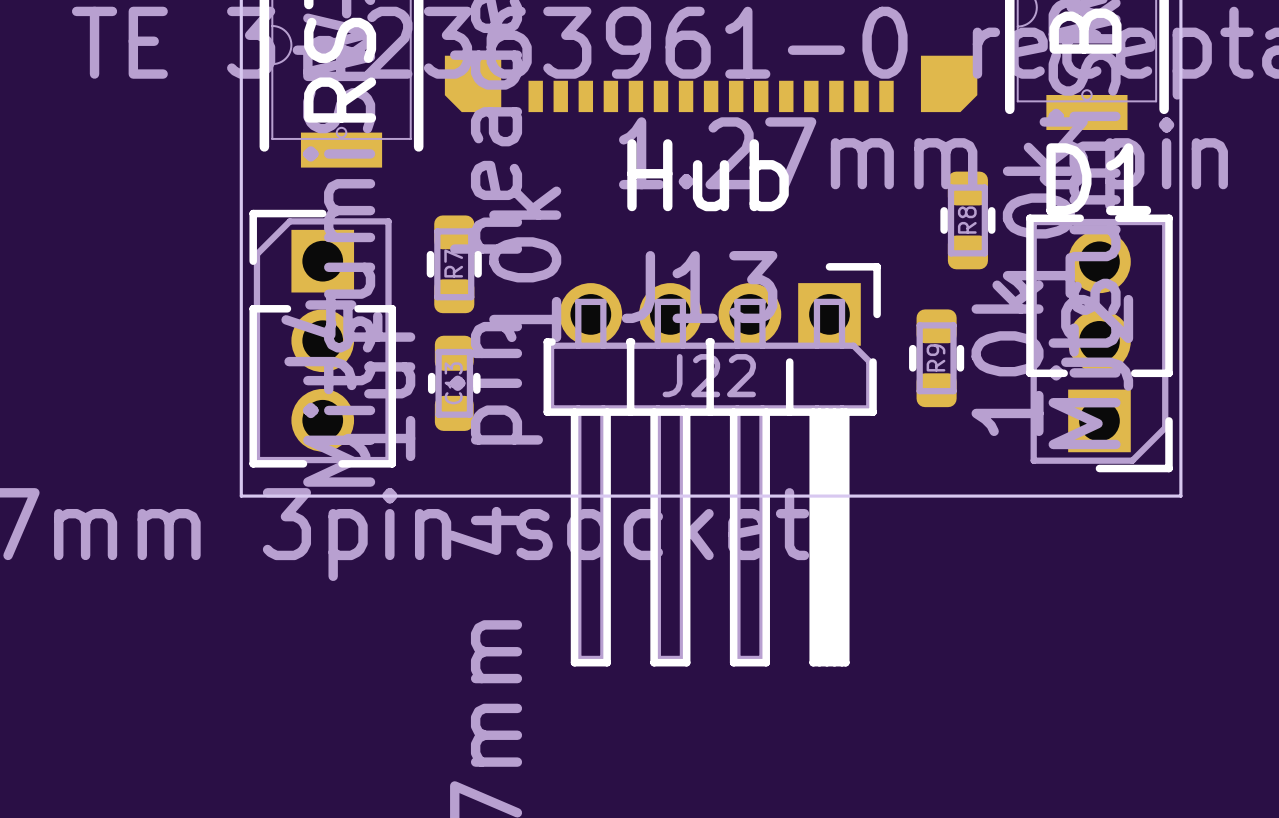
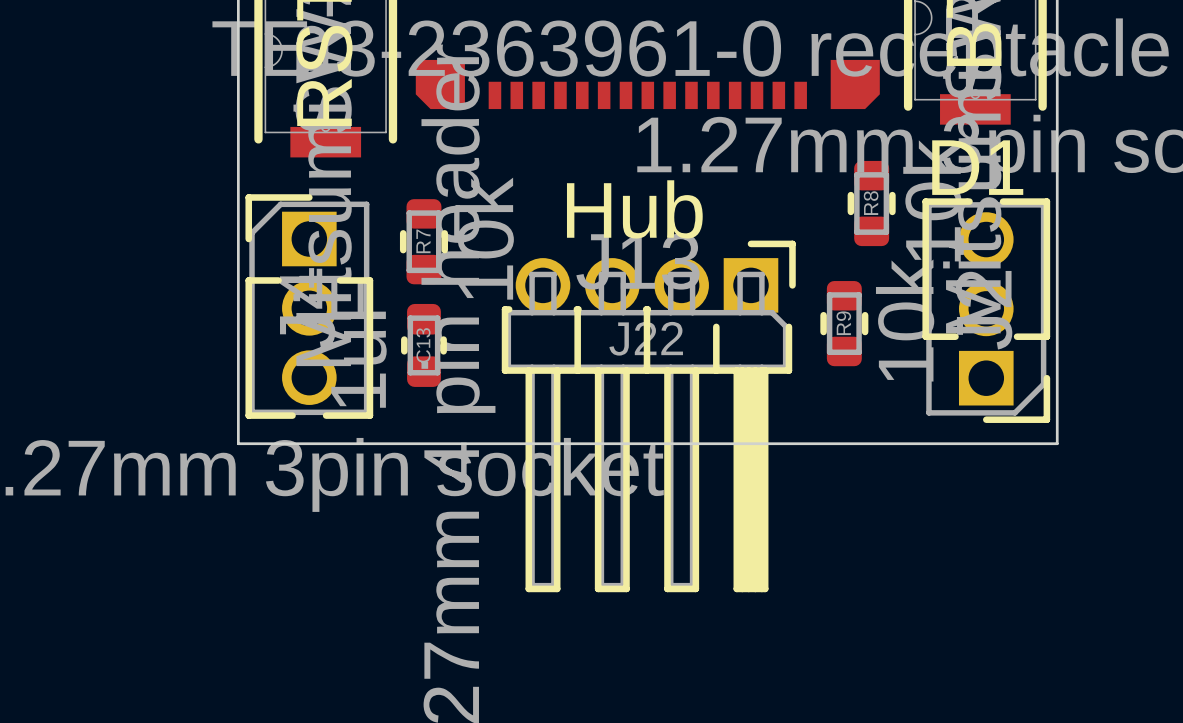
text position: Hub (708, 175) -> Hub (634, 209)

